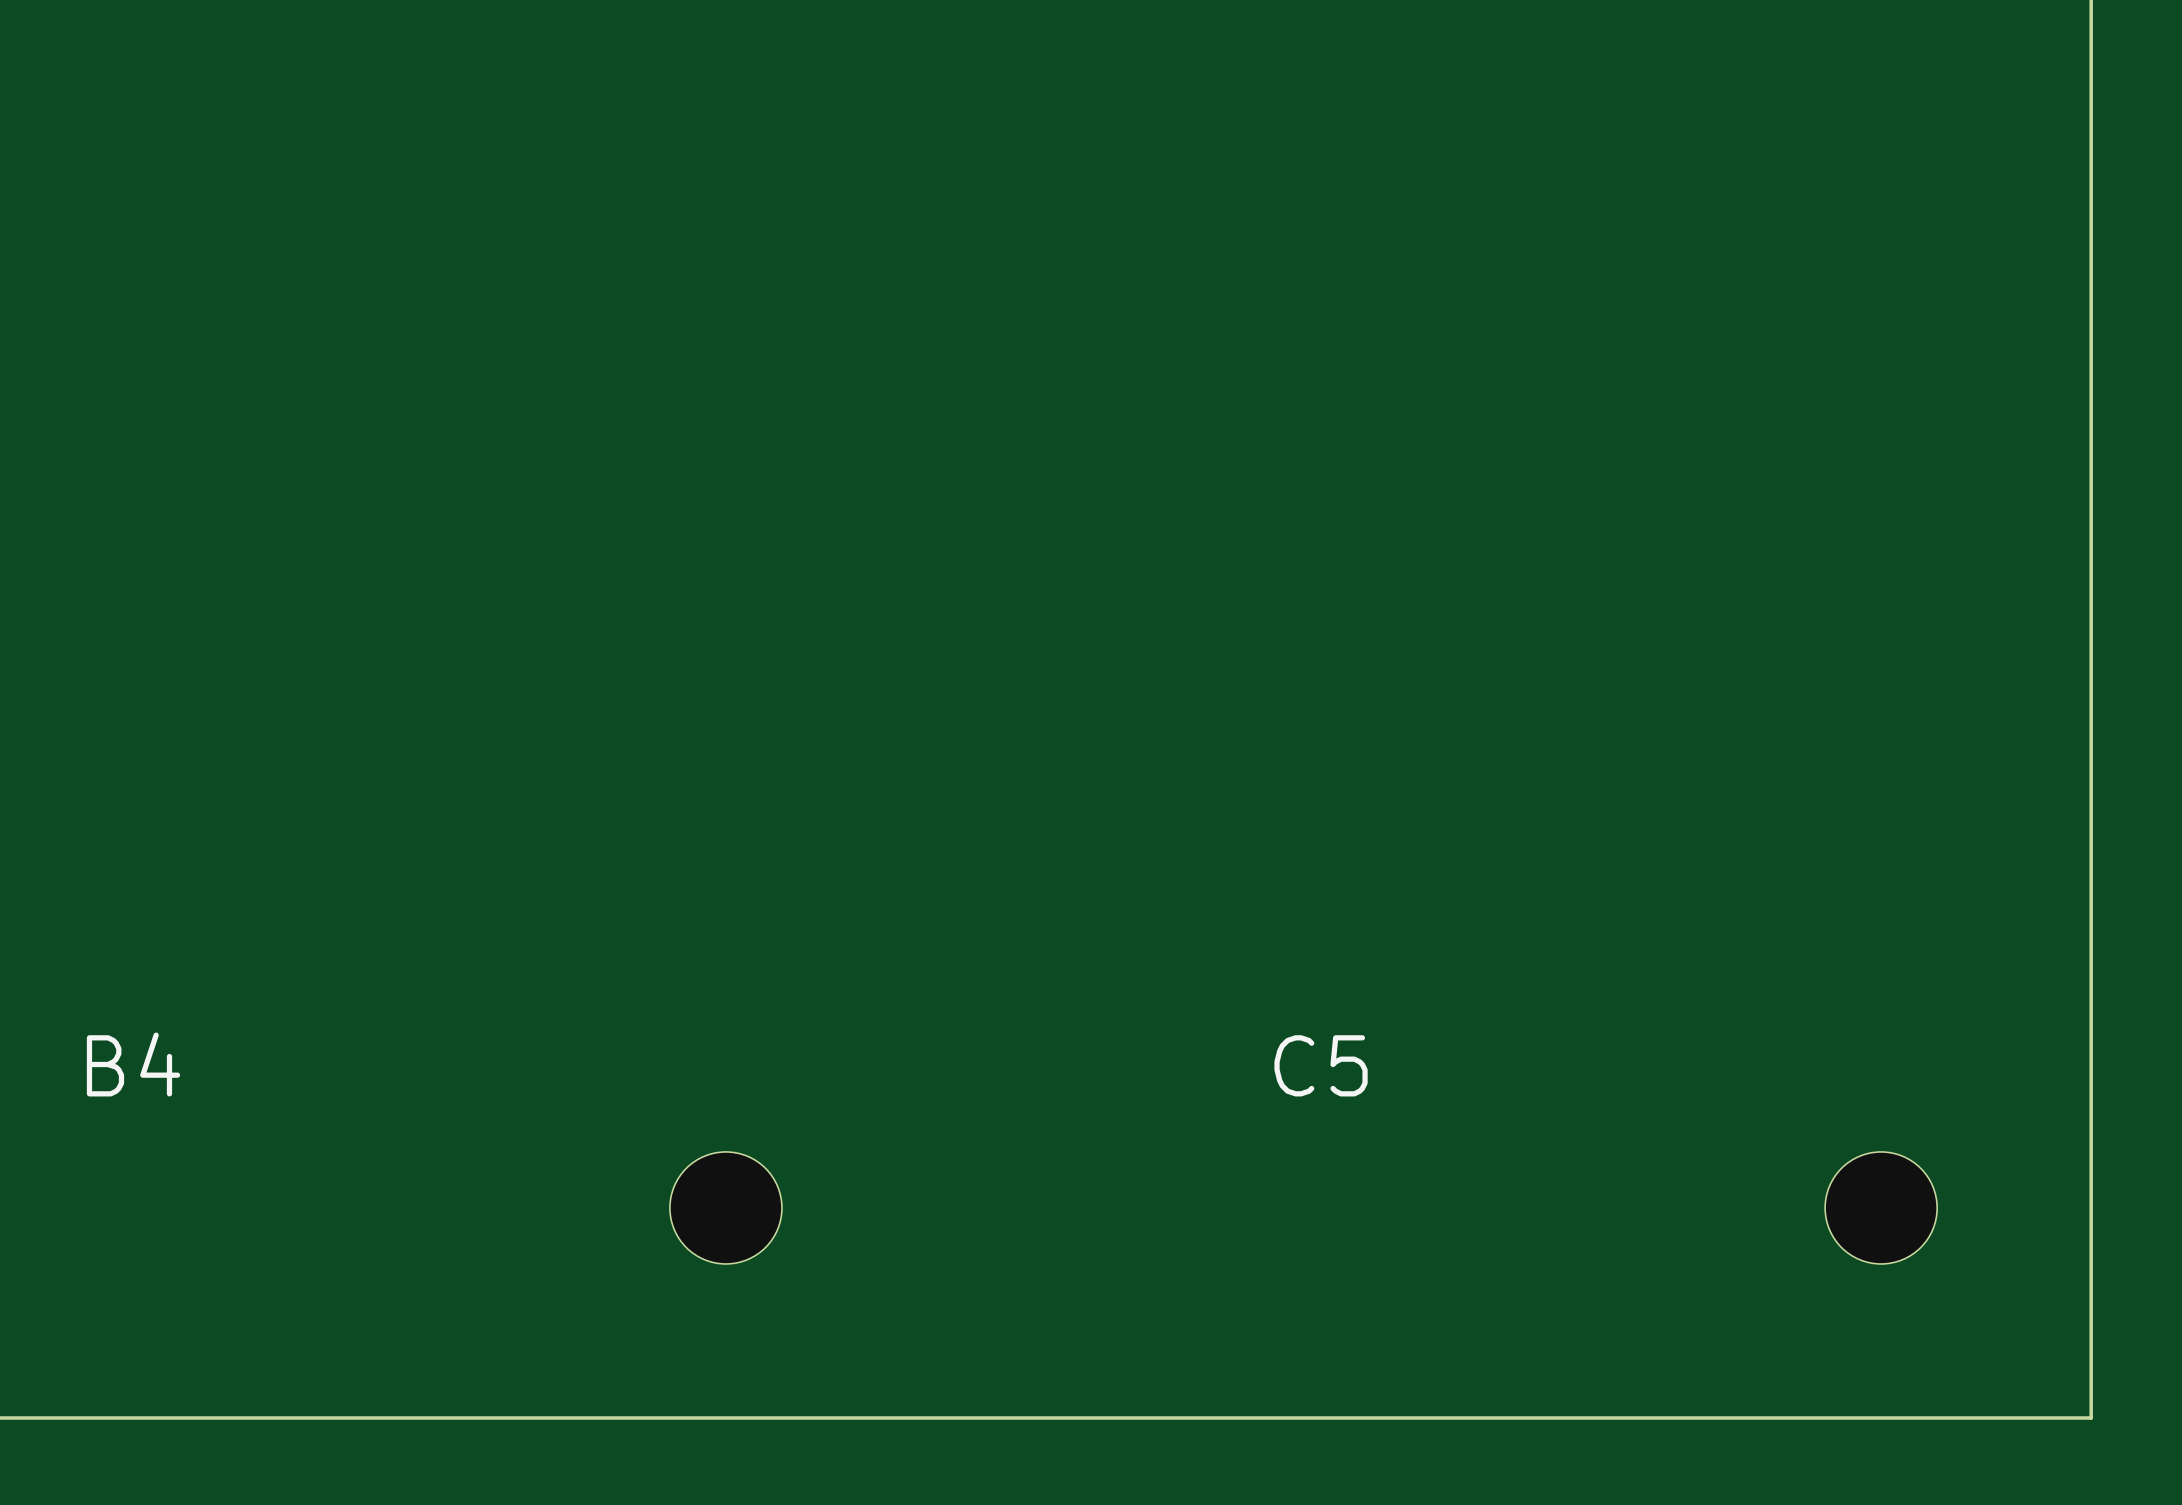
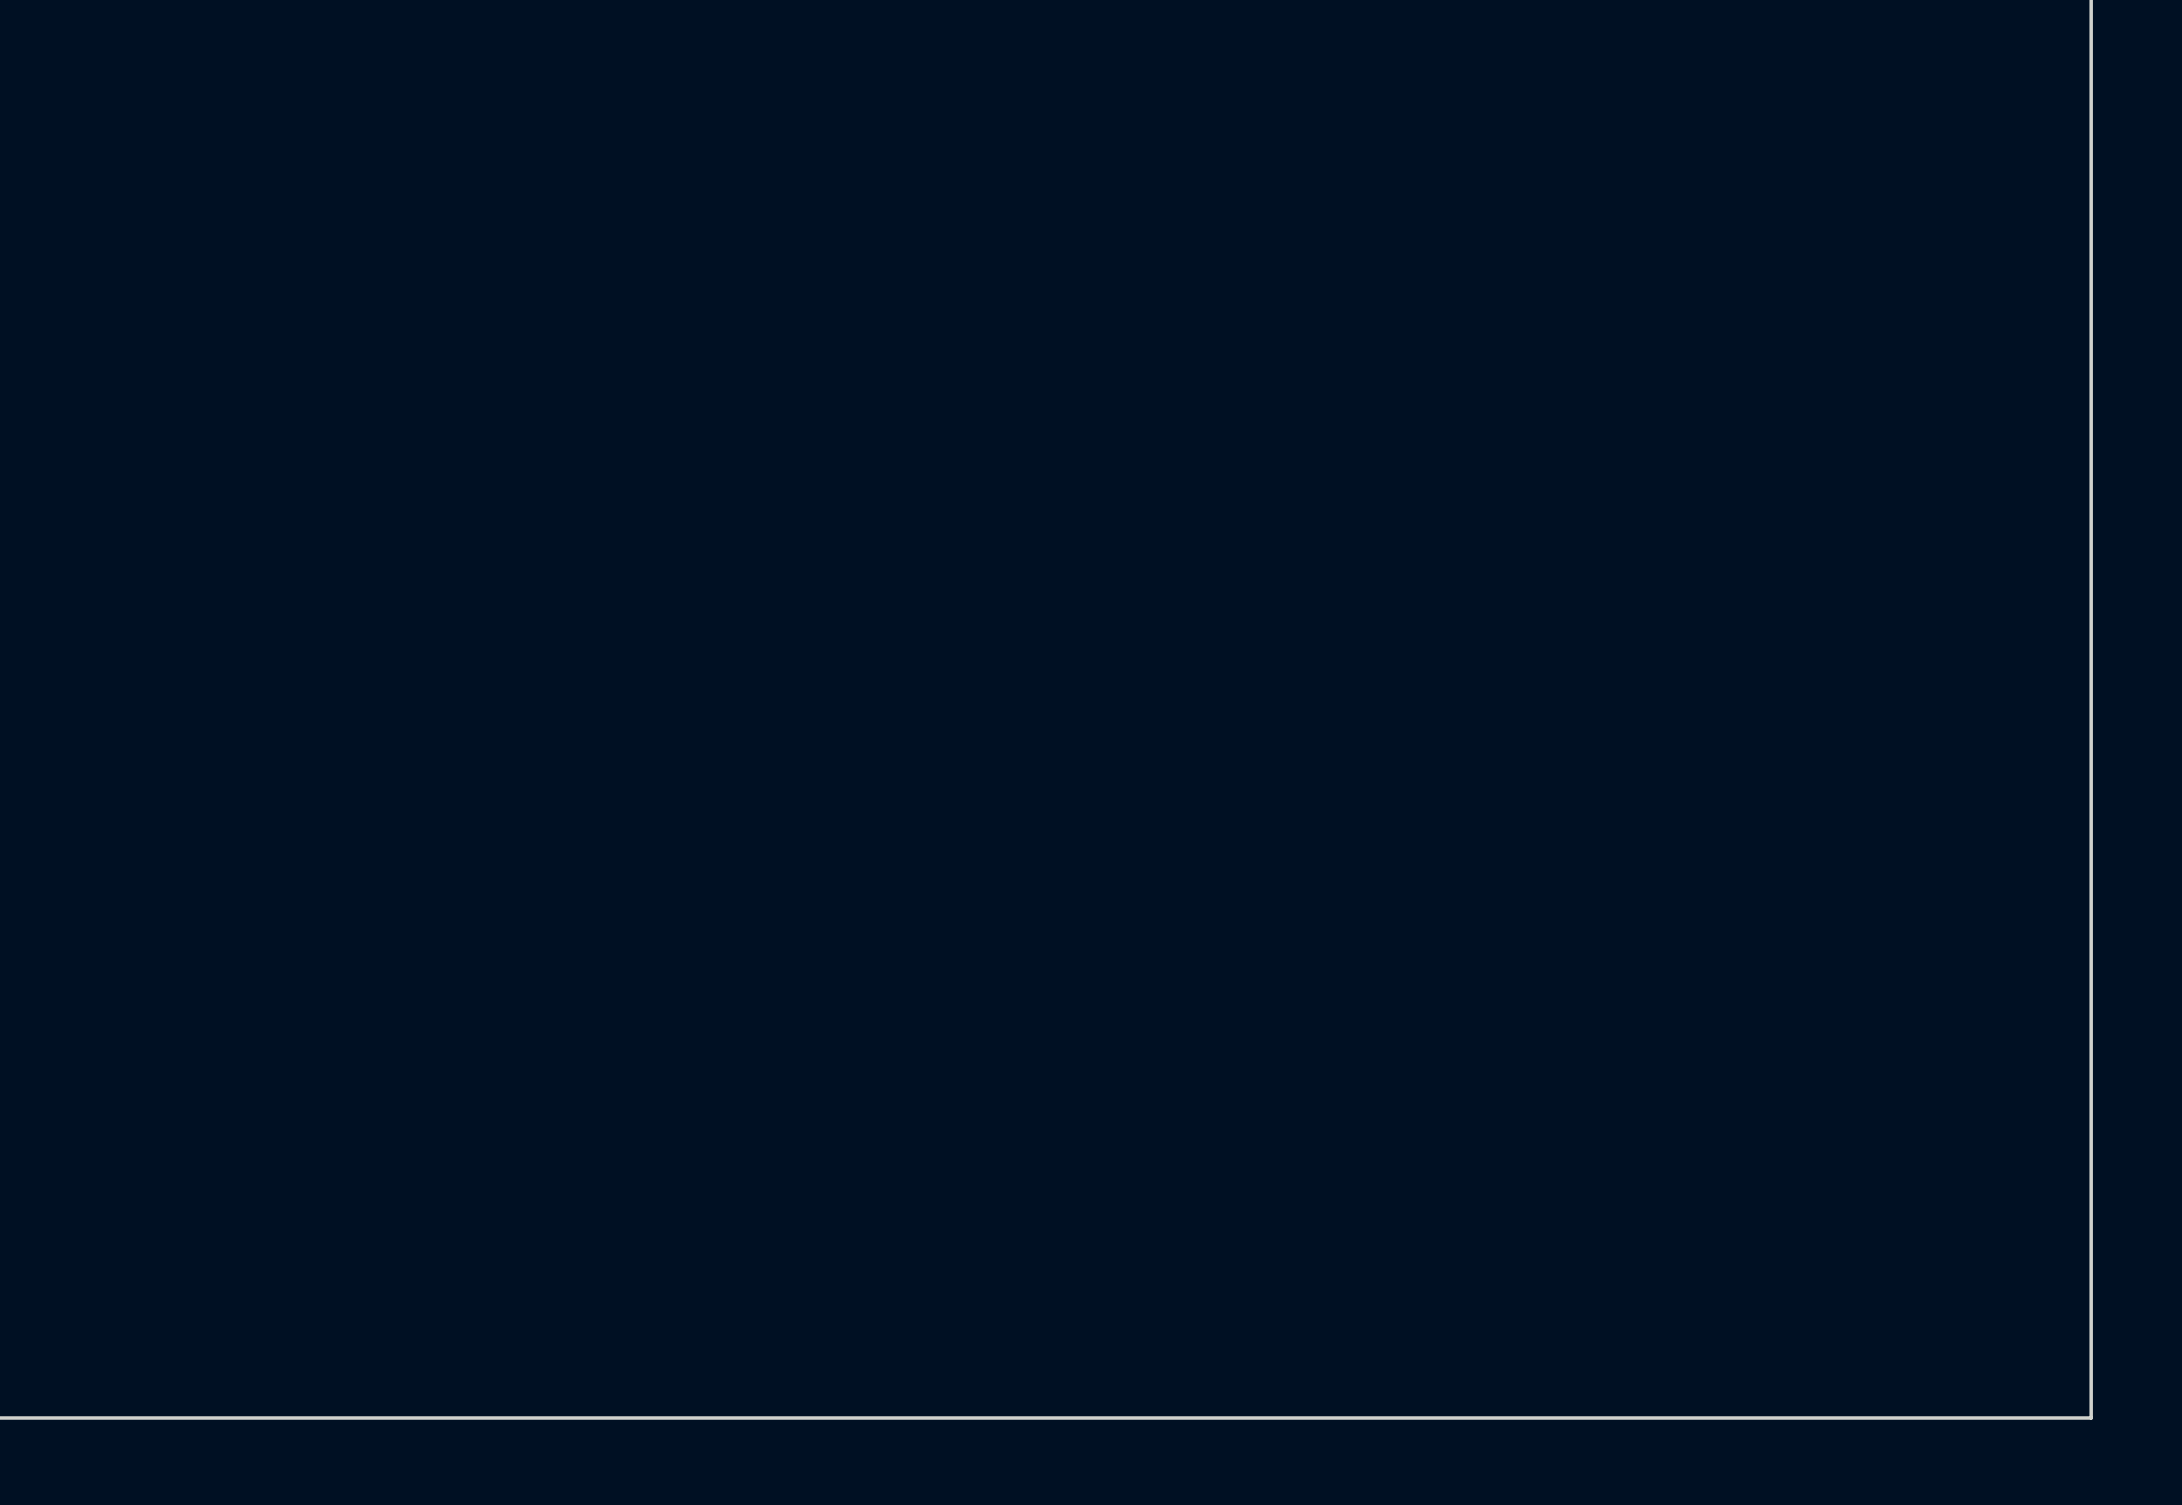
text: B4 (133, 1064) -> none
text: C5 (1321, 1065) -> none
part: (725, 1207) -> none
part: (1881, 1207) -> none

